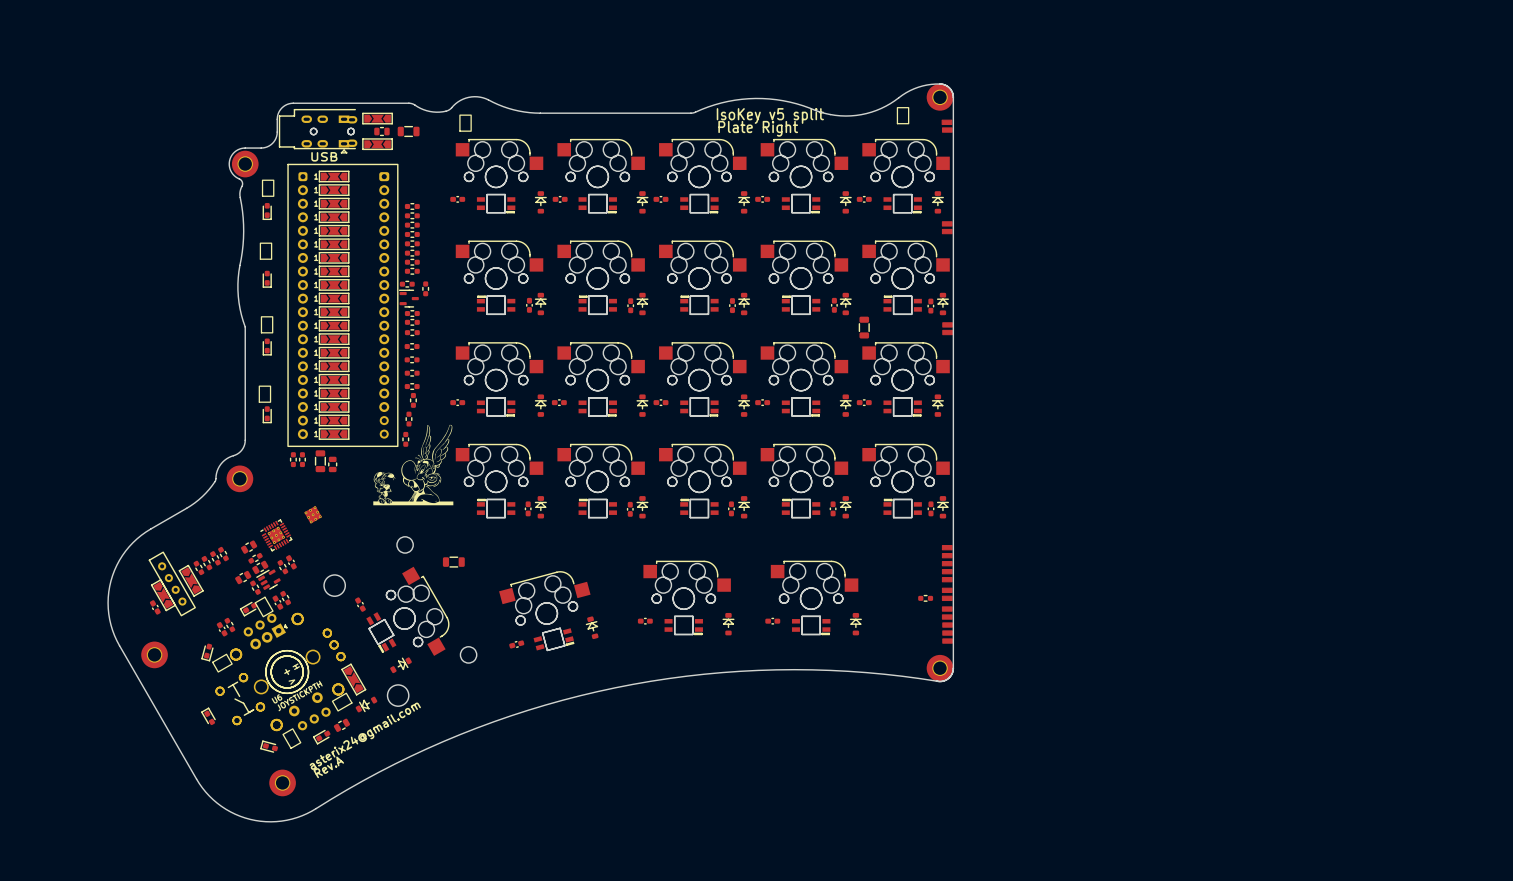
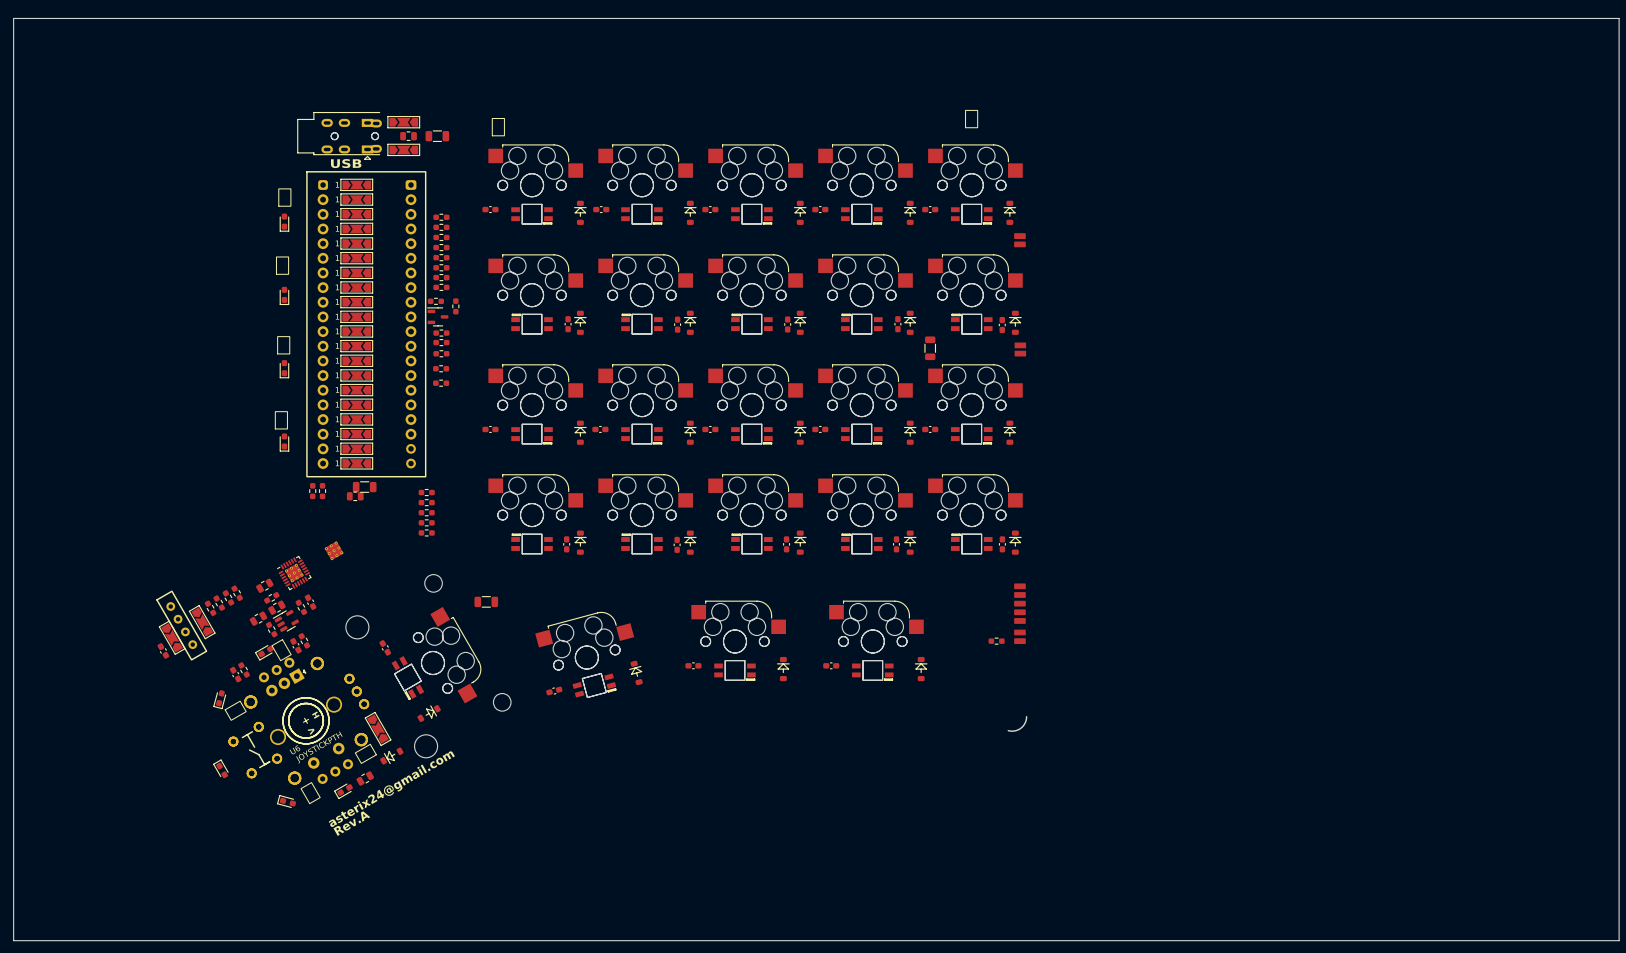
board edge: none -> (13, 18) (1619, 18) (1619, 940) (13, 940) (13, 18)
board edge: (940, 84) (949, 87) (953, 97) -> none
board edge: (940, 84) (949, 87) (953, 97) -> none
board edge: (940, 84) (918, 87) (881, 108) (851, 115) (830, 114) (789, 102) (762, 98) (728, 101) (690, 113) (529, 112) (508, 108) (485, 98) (474, 96) (463, 99) (449, 109) (439, 112) (426, 110) (410, 103) (291, 103) (283, 106) (278, 113) (276, 136) (270, 144) (263, 147) (241, 148) (234, 152) (229, 161) (230, 168) (242, 183) (239, 193) (243, 238) (237, 290) (240, 308) (245, 327) (244, 444) (239, 452) (226, 458) (220, 464) (215, 481) (198, 499) (146, 531) (129, 546) (114, 570) (108, 597) (109, 619) (116, 640) (196, 779) (209, 795) (230, 811) (250, 819) (271, 821) (292, 819) (311, 811) (394, 764) (477, 727) (562, 700) (650, 681) (722, 672) (794, 669) (866, 672) (939, 681) (948, 678) (953, 668) (953, 97) -> none
part: (940, 97) -> none
text: IsoKey v5 split (770, 115) -> none
part: (946, 122) -> none
text: Plate Right (758, 128) -> none
part: (947, 130) -> none
part: (245, 164) -> none
part: (412, 373) -> none
part: (412, 386) -> none
part: (413, 400) -> none
part: (408, 419) -> none
drawing: [373, 424, 454, 506] -> none
part: (405, 439) -> none
part: none -> (426, 492)
part rotation: 0° (320, 461) -> 90° clockwise (364, 487)
part position: (320, 461) -> (364, 487)
part rotation: 0° (332, 464) -> 90° clockwise (355, 496)
part: none -> (426, 502)
part: (239, 478) -> none
part: none -> (426, 512)
part: none -> (426, 522)
part: none -> (426, 532)
part: (947, 609) -> none
part: (947, 617) -> none
part: (947, 625) -> none
part: (947, 633) -> none
part: (947, 641) -> none
part: (154, 654) -> none
part: (940, 668) -> none
part: (282, 782) -> none

